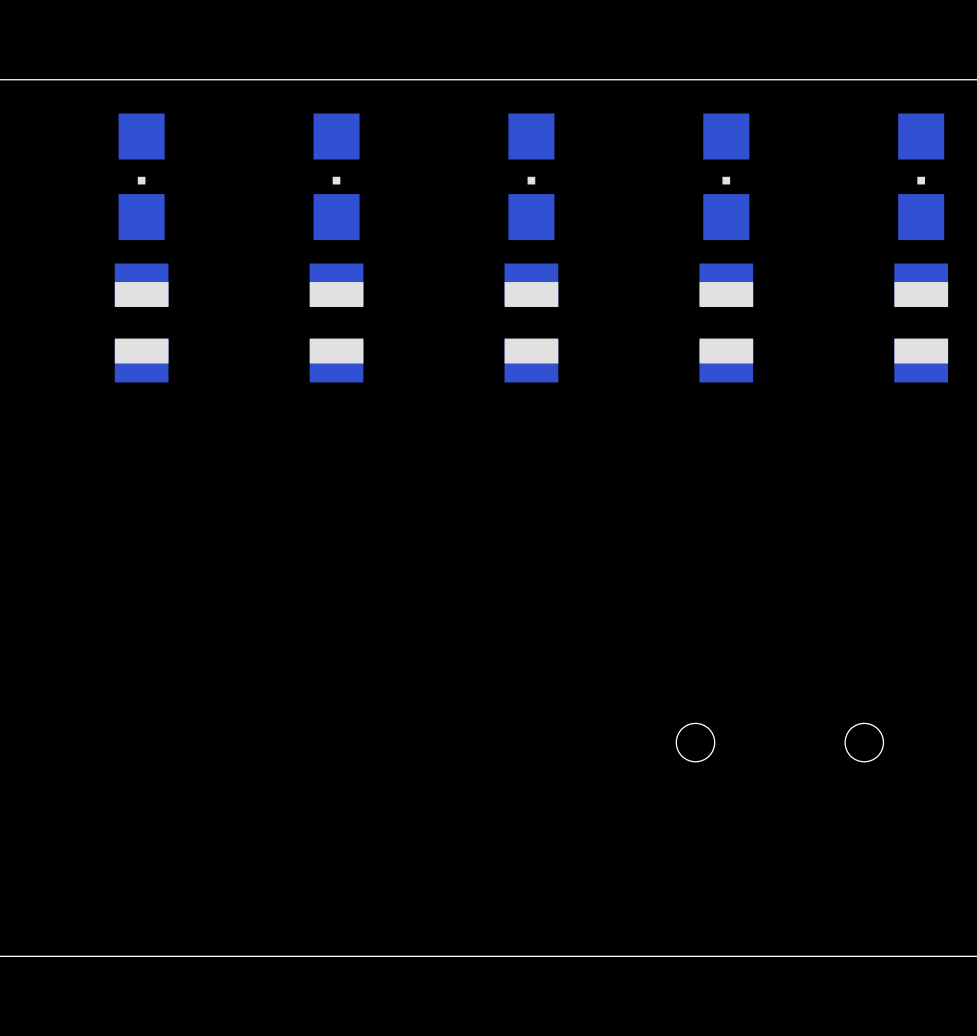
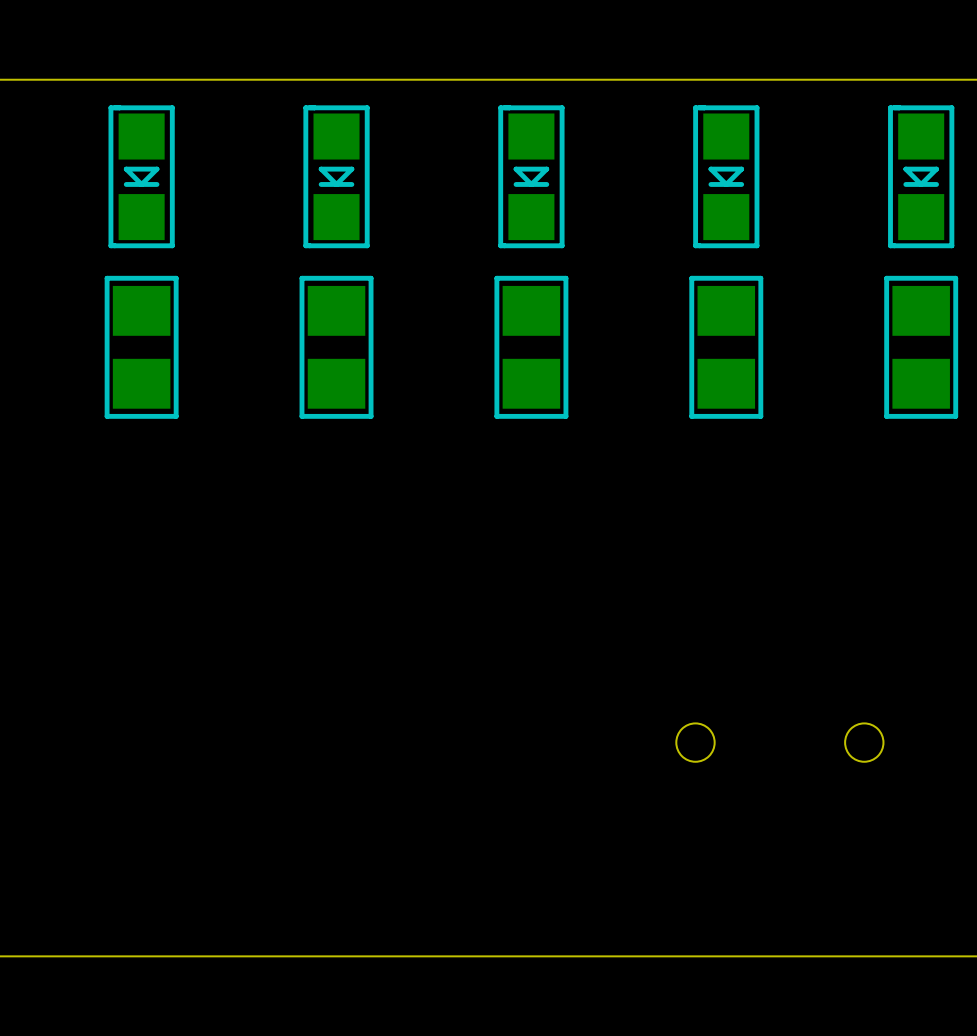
part footprint: [118, 113, 165, 241] -> [108, 105, 175, 249]
part footprint: [313, 113, 360, 241] -> [303, 105, 370, 249]
part footprint: [508, 113, 555, 241] -> [498, 105, 565, 249]
part footprint: [703, 113, 750, 241] -> [693, 105, 760, 249]
part footprint: [898, 113, 945, 241] -> [888, 105, 955, 249]
part footprint: [114, 263, 169, 383] -> [104, 275, 179, 419]
part footprint: [309, 263, 364, 383] -> [299, 275, 374, 419]
part footprint: [504, 263, 559, 383] -> [494, 275, 569, 419]
part footprint: [699, 263, 754, 383] -> [689, 275, 764, 419]
part footprint: [894, 263, 949, 383] -> [884, 275, 959, 419]

